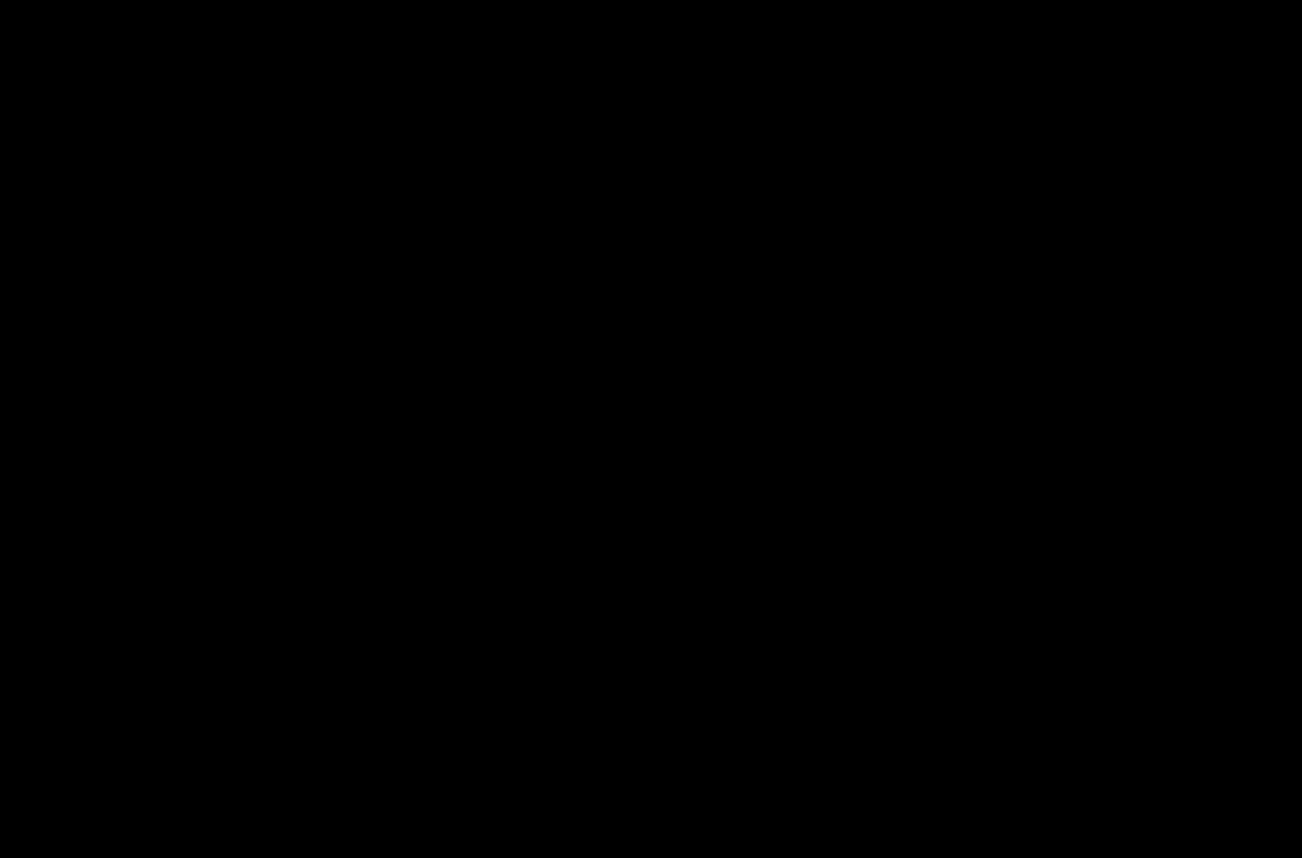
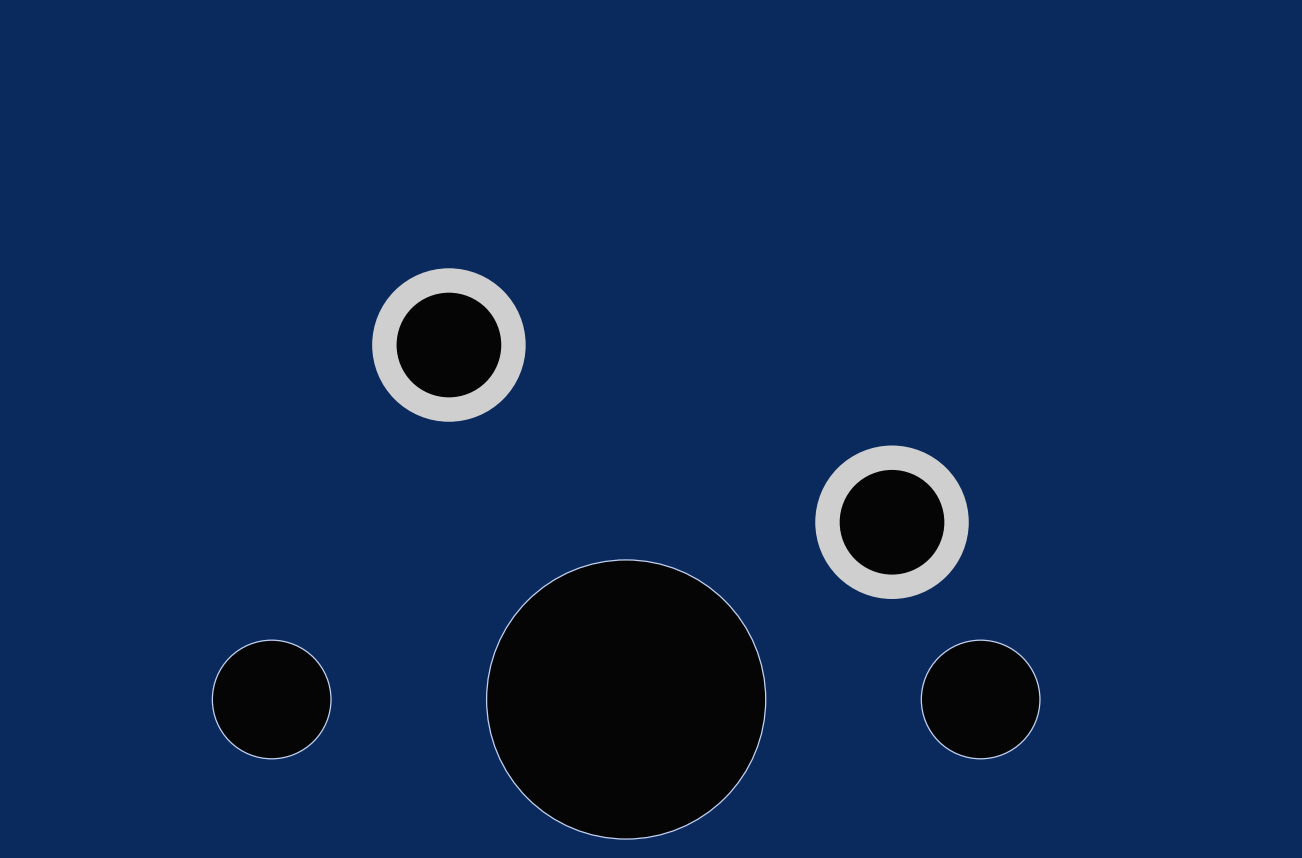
part: none -> (626, 553)

